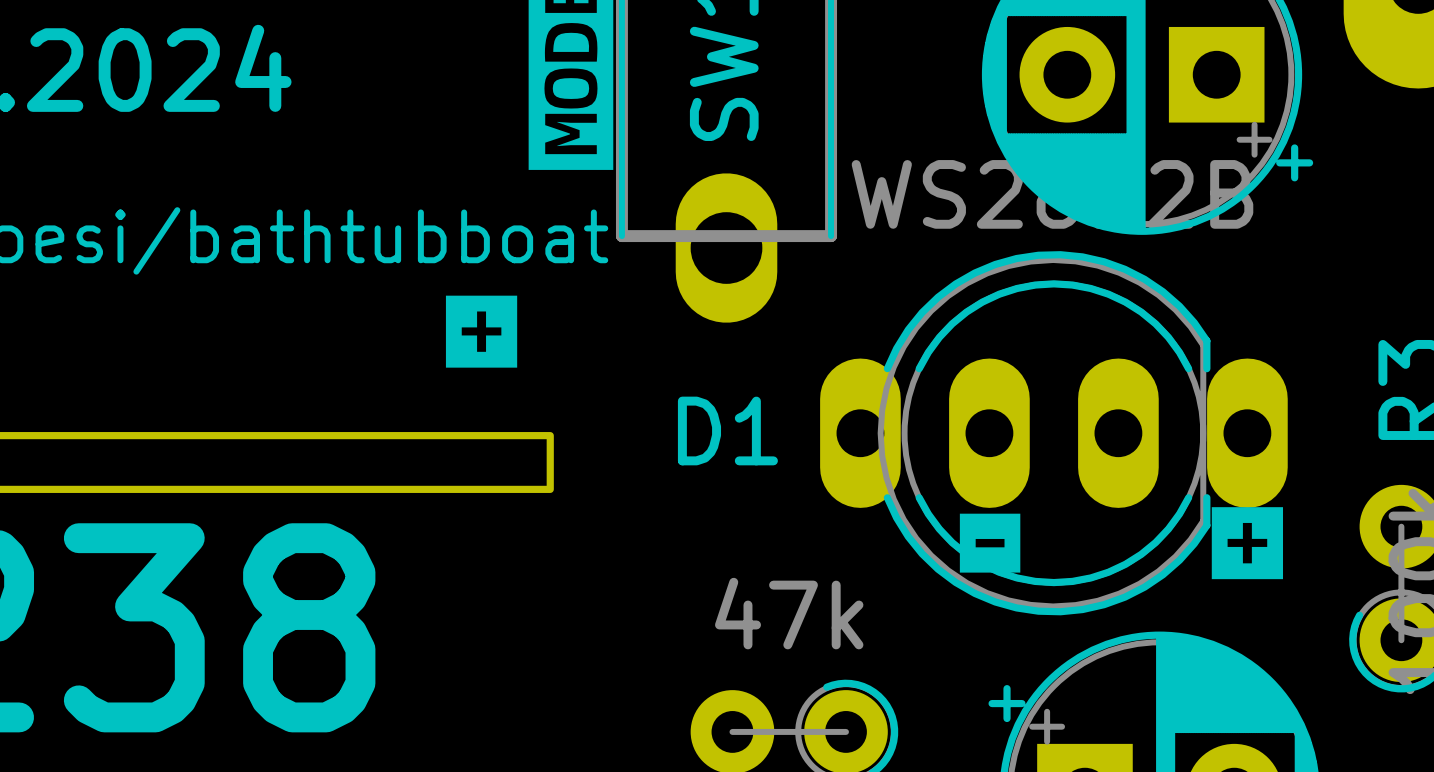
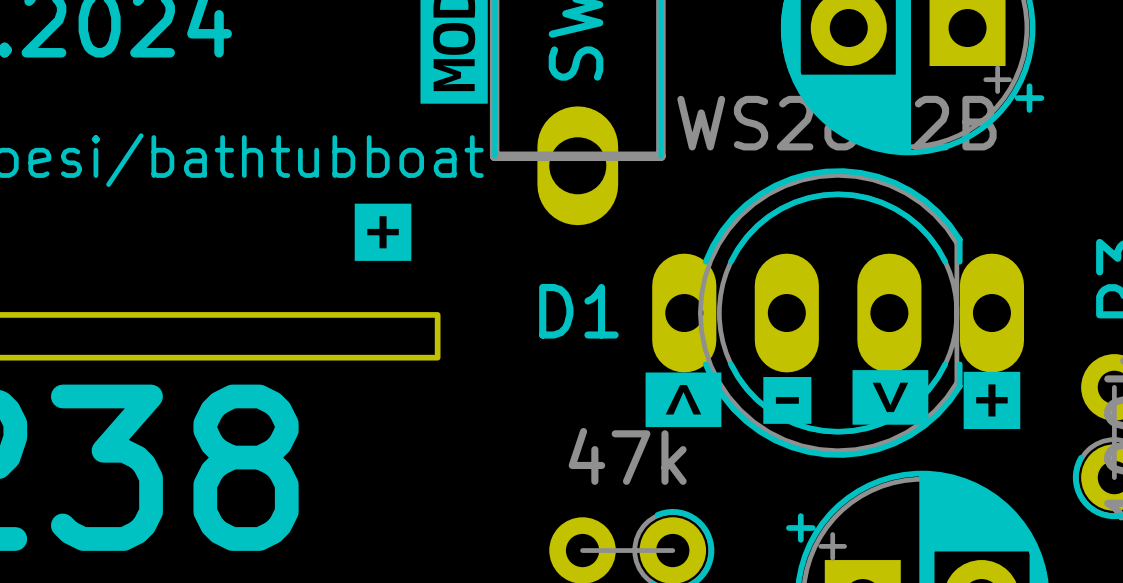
drawing: none -> [852, 370, 929, 425]
drawing: none -> [645, 372, 722, 428]

